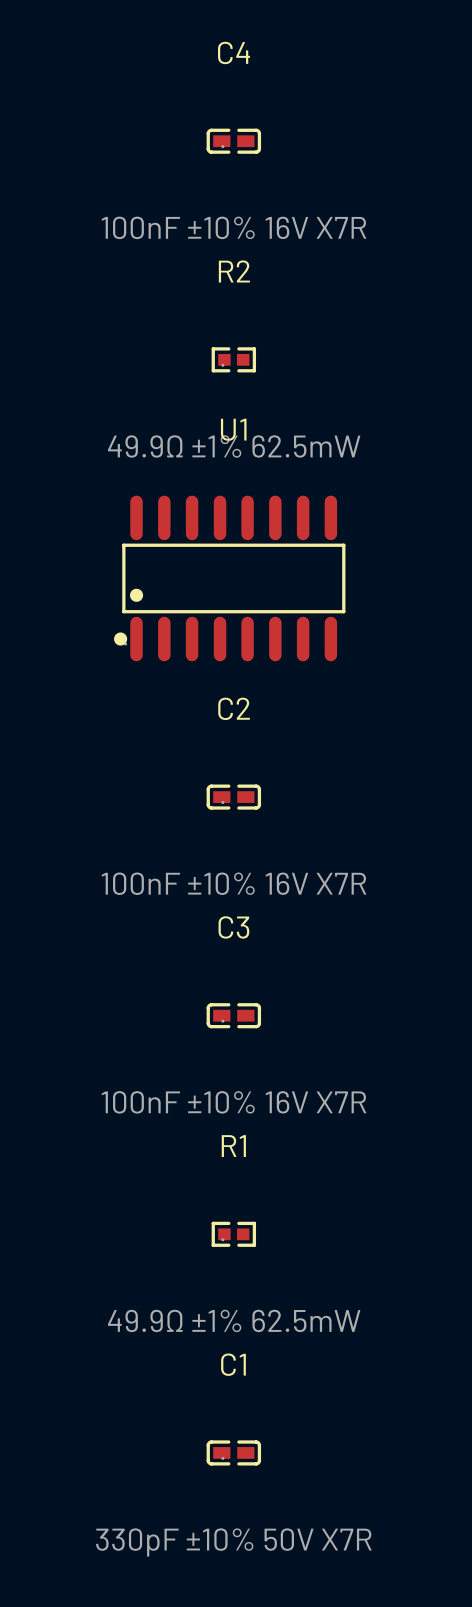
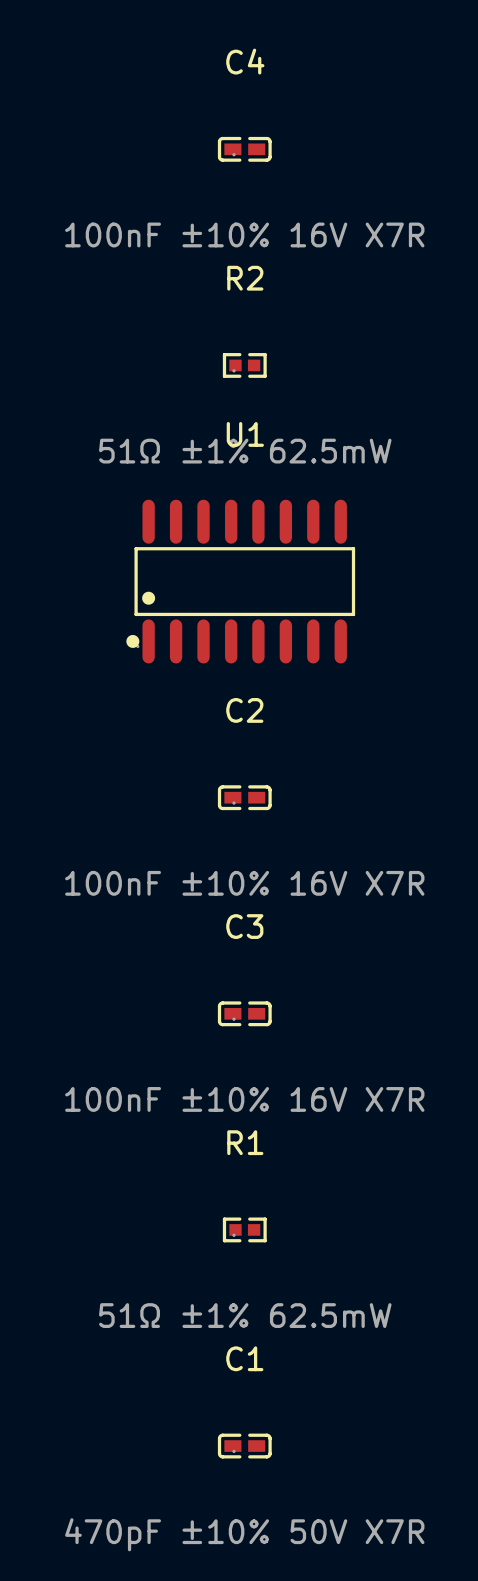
R2 value: 49.9Ω ±1% 62.5mW (234, 446) -> 51Ω ±1% 62.5mW (245, 451)
R1 value: 49.9Ω ±1% 62.5mW (234, 1320) -> 51Ω ±1% 62.5mW (245, 1315)
C1 value: 330pF ±10% 50V X7R (233, 1542) -> 470pF ±10% 50V X7R (244, 1534)

